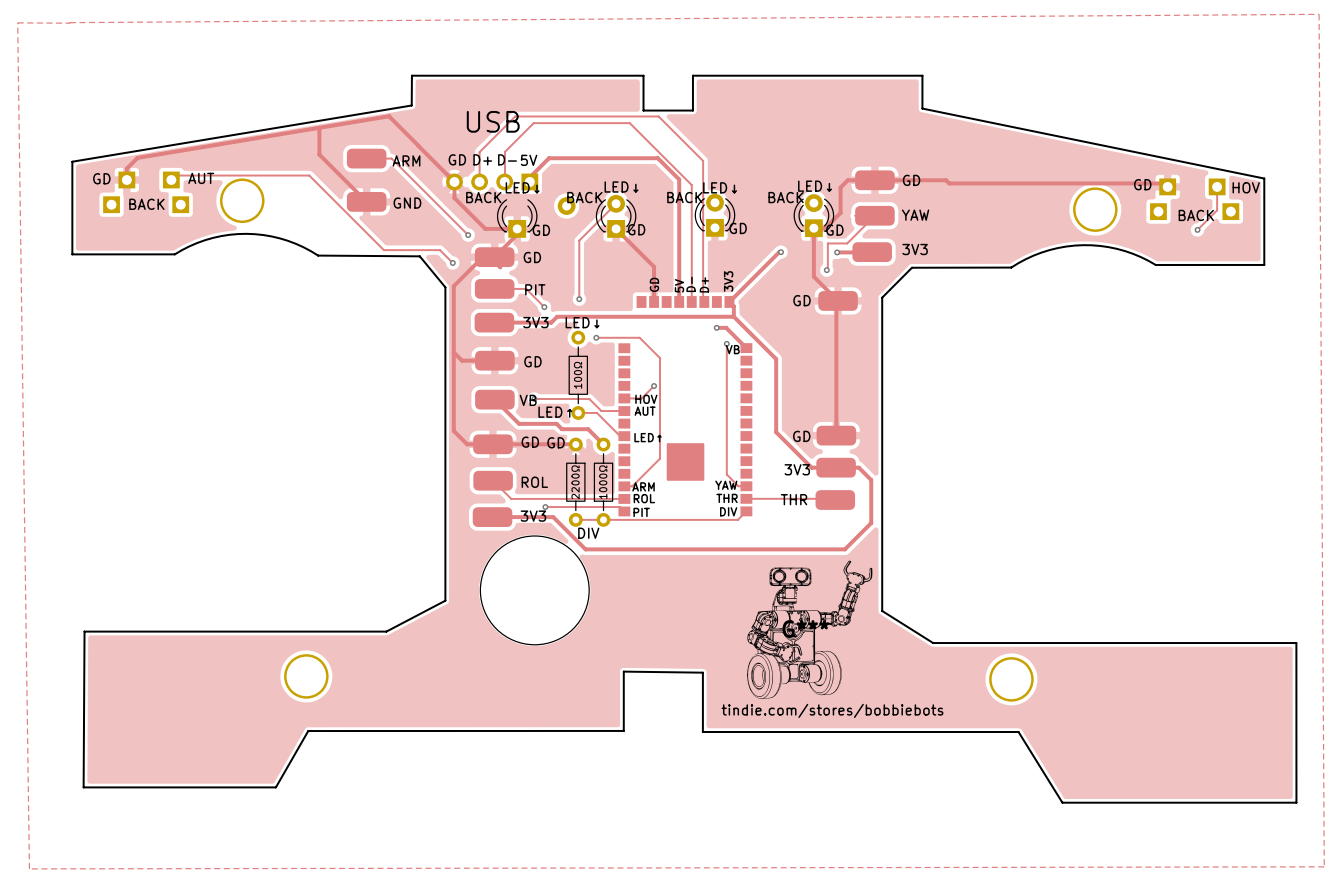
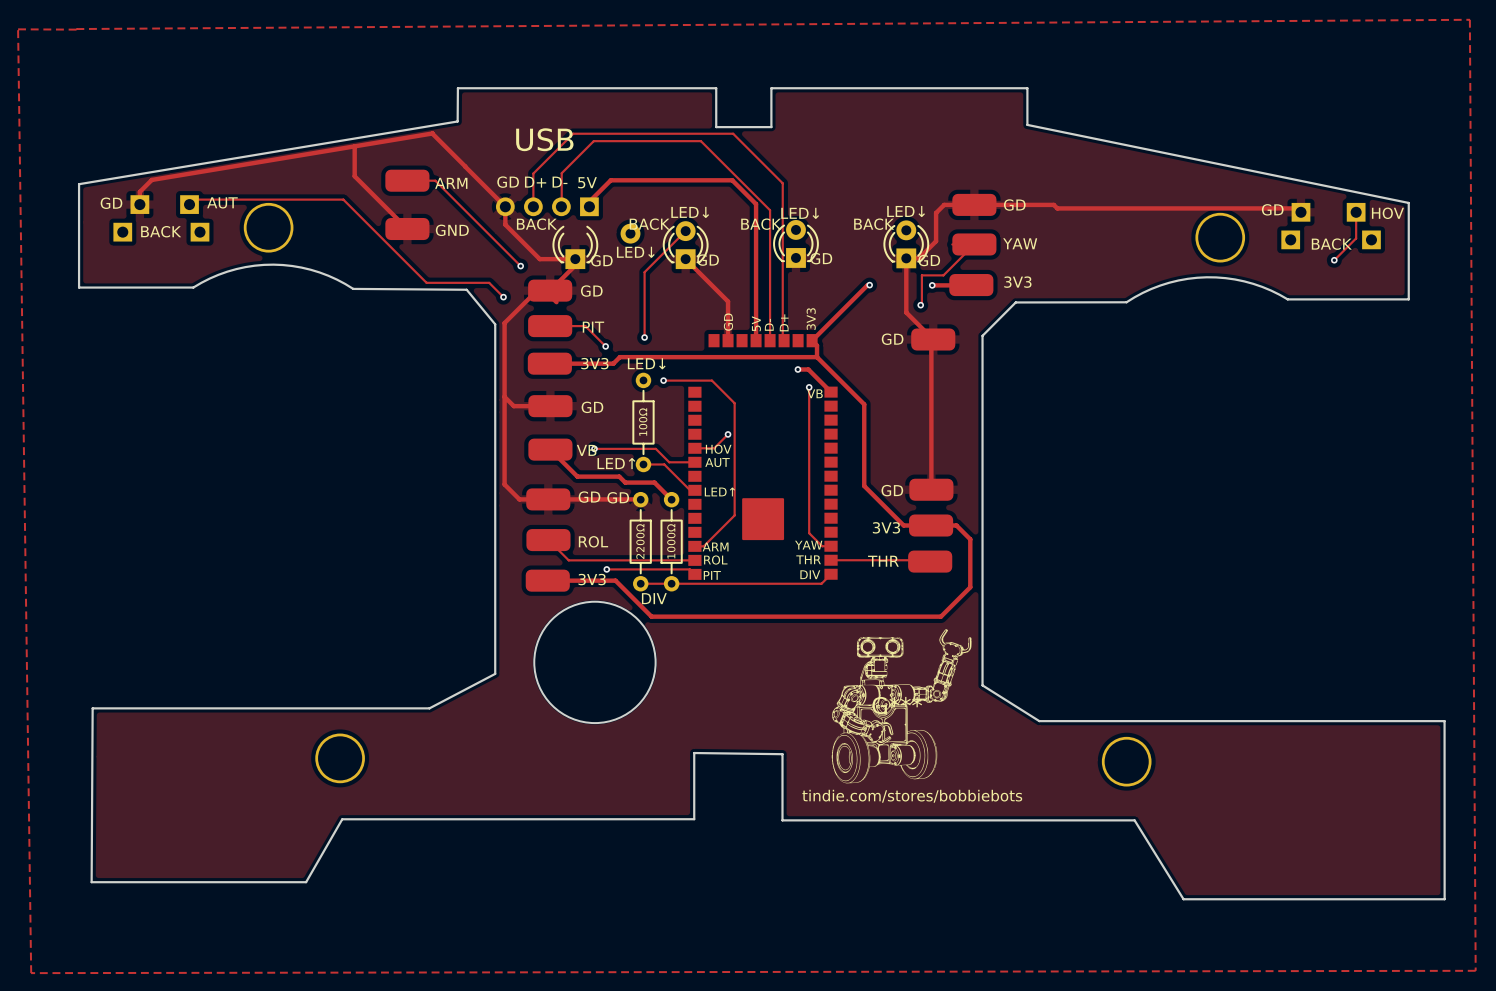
text position: LED↓ (522, 187) -> LED↓ (635, 252)

